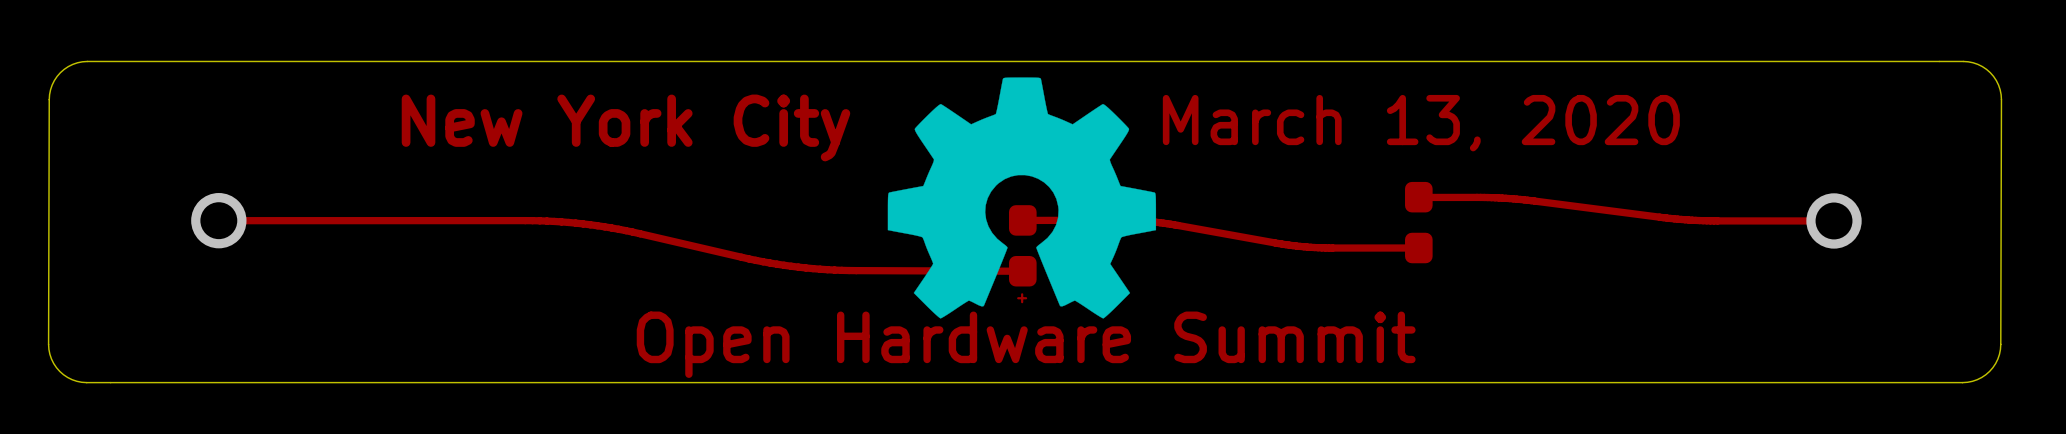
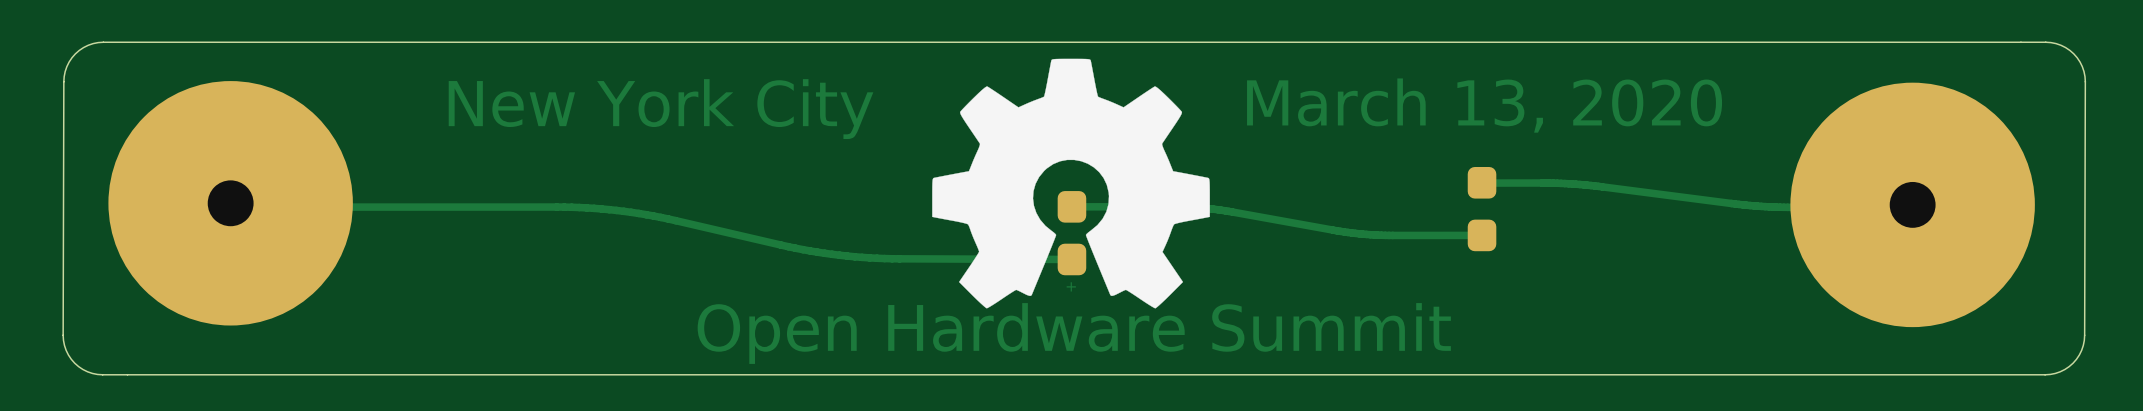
part: none -> (230, 203)
part: none -> (1912, 204)
via: (218, 220) -> none
via: (1834, 220) -> none

